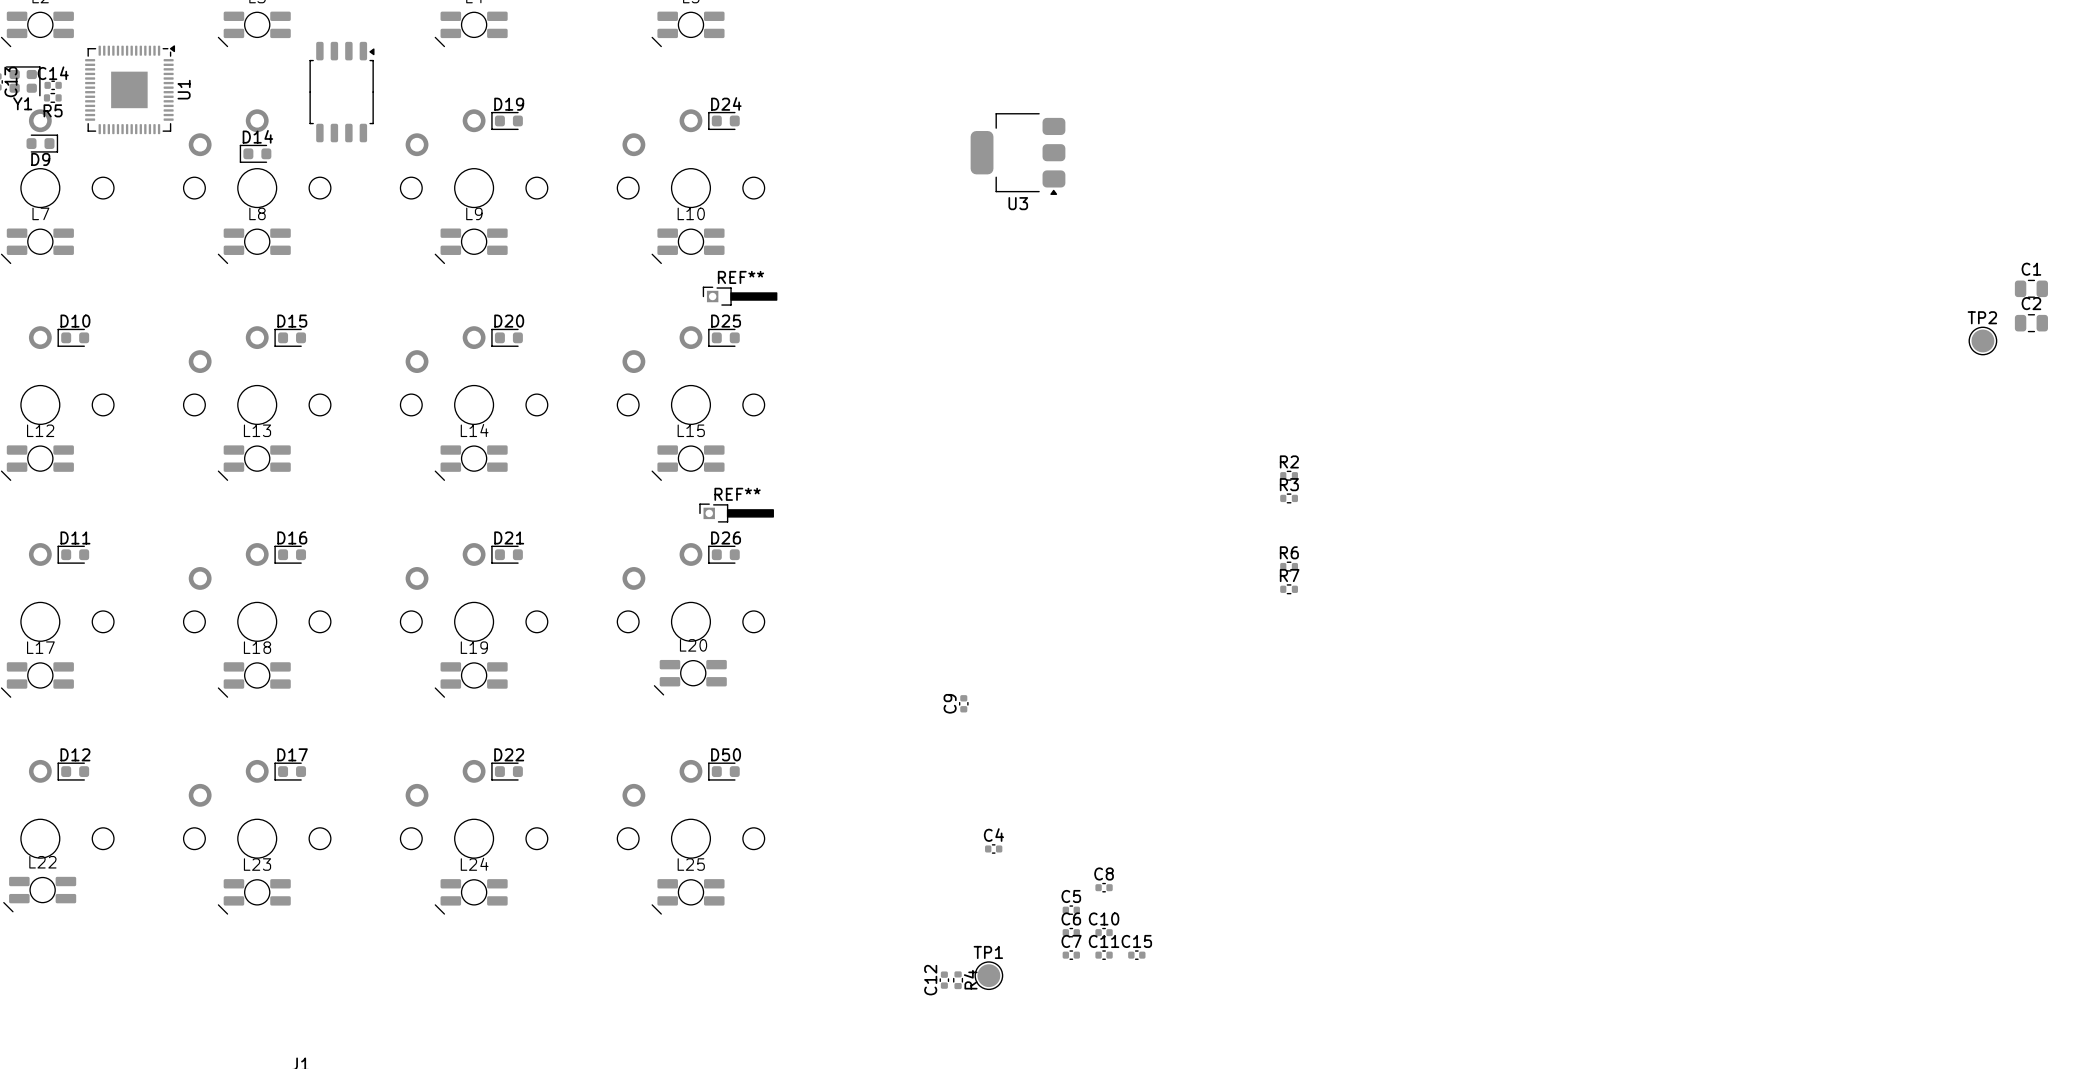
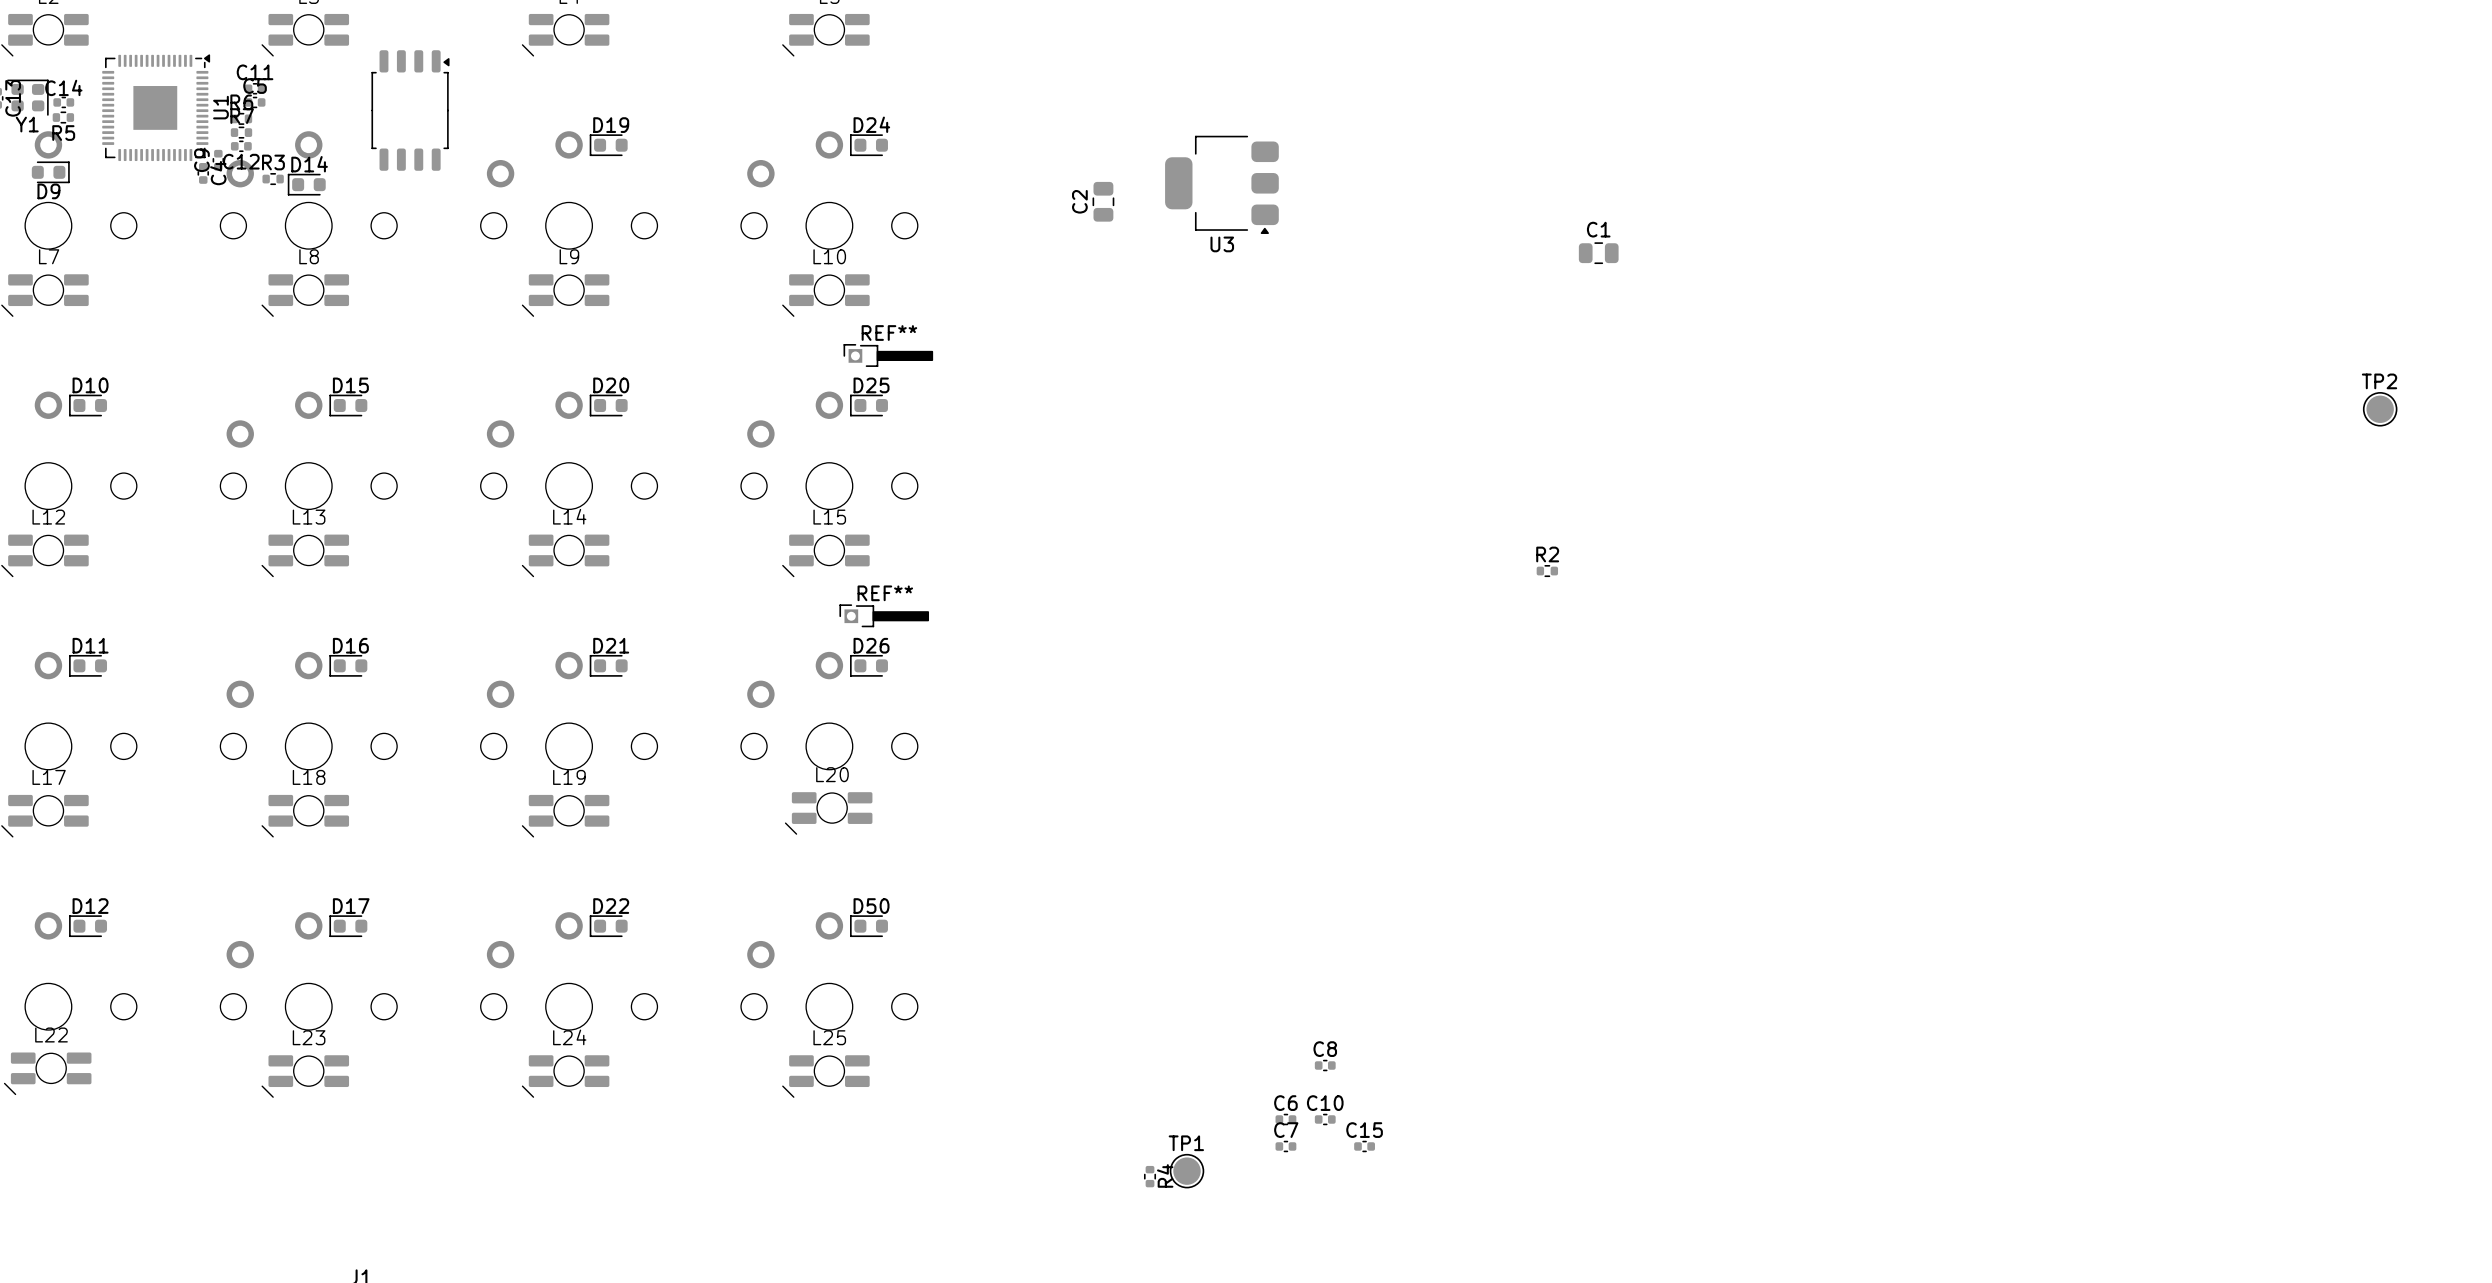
C1 position: (2031, 288) -> (1598, 253)
C2 name position: C2 (2031, 303) -> C2 (1079, 201)
C2 rotation: 0° (2031, 323) -> 90° clockwise (1103, 201)
C2 position: (2031, 323) -> (1103, 201)
R3 position: (1289, 498) -> (273, 179)
R6 position: (1289, 566) -> (241, 118)
R7 position: (1289, 589) -> (241, 132)
C9 position: (963, 703) -> (218, 160)
C4 rotation: 0° (993, 848) -> 90° clockwise (203, 173)
C4 position: (993, 848) -> (203, 173)
C5 position: (1071, 910) -> (255, 102)
C11 position: (1104, 955) -> (255, 88)
C12 rotation: 0° (944, 980) -> 90° clockwise (241, 146)
C12 position: (944, 980) -> (241, 146)

